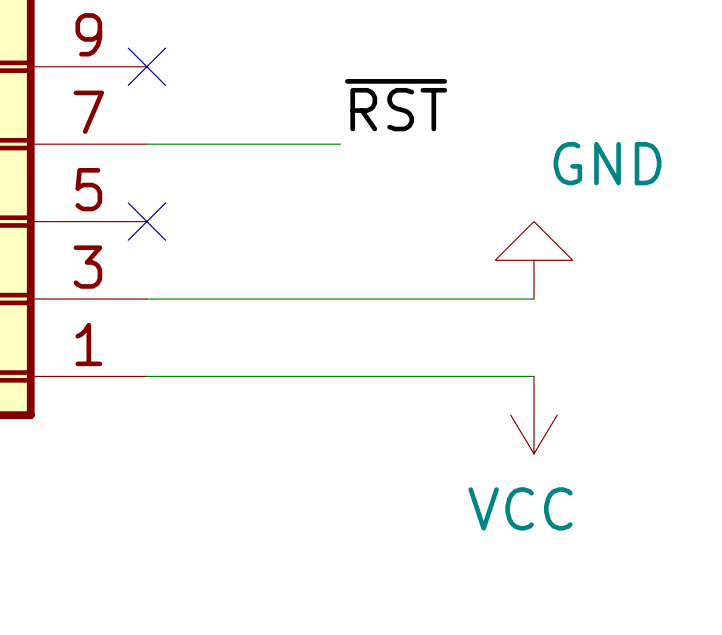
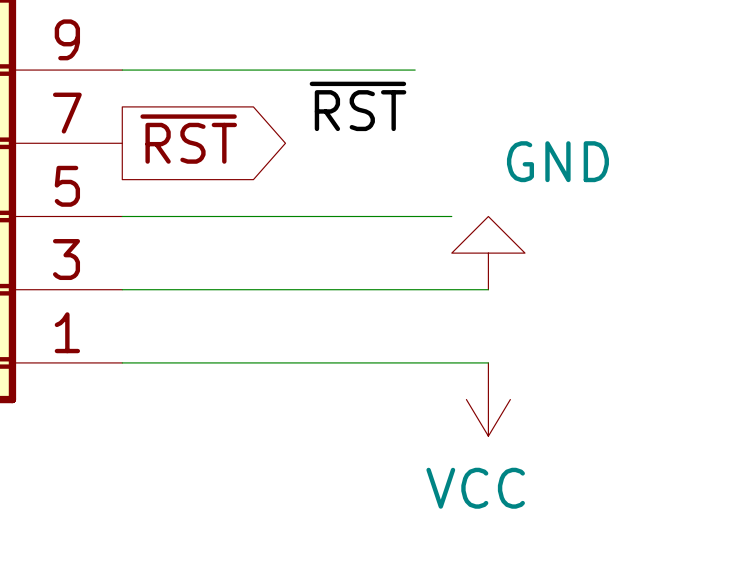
wire: none -> (122, 70) (415, 70)
no-connect mark: (146, 66) -> none
global label: none -> ~{RST} (188, 139)
wire: (146, 144) (340, 144) -> none
wire: none -> (122, 216) (451, 216)
no-connect mark: (146, 221) -> none

